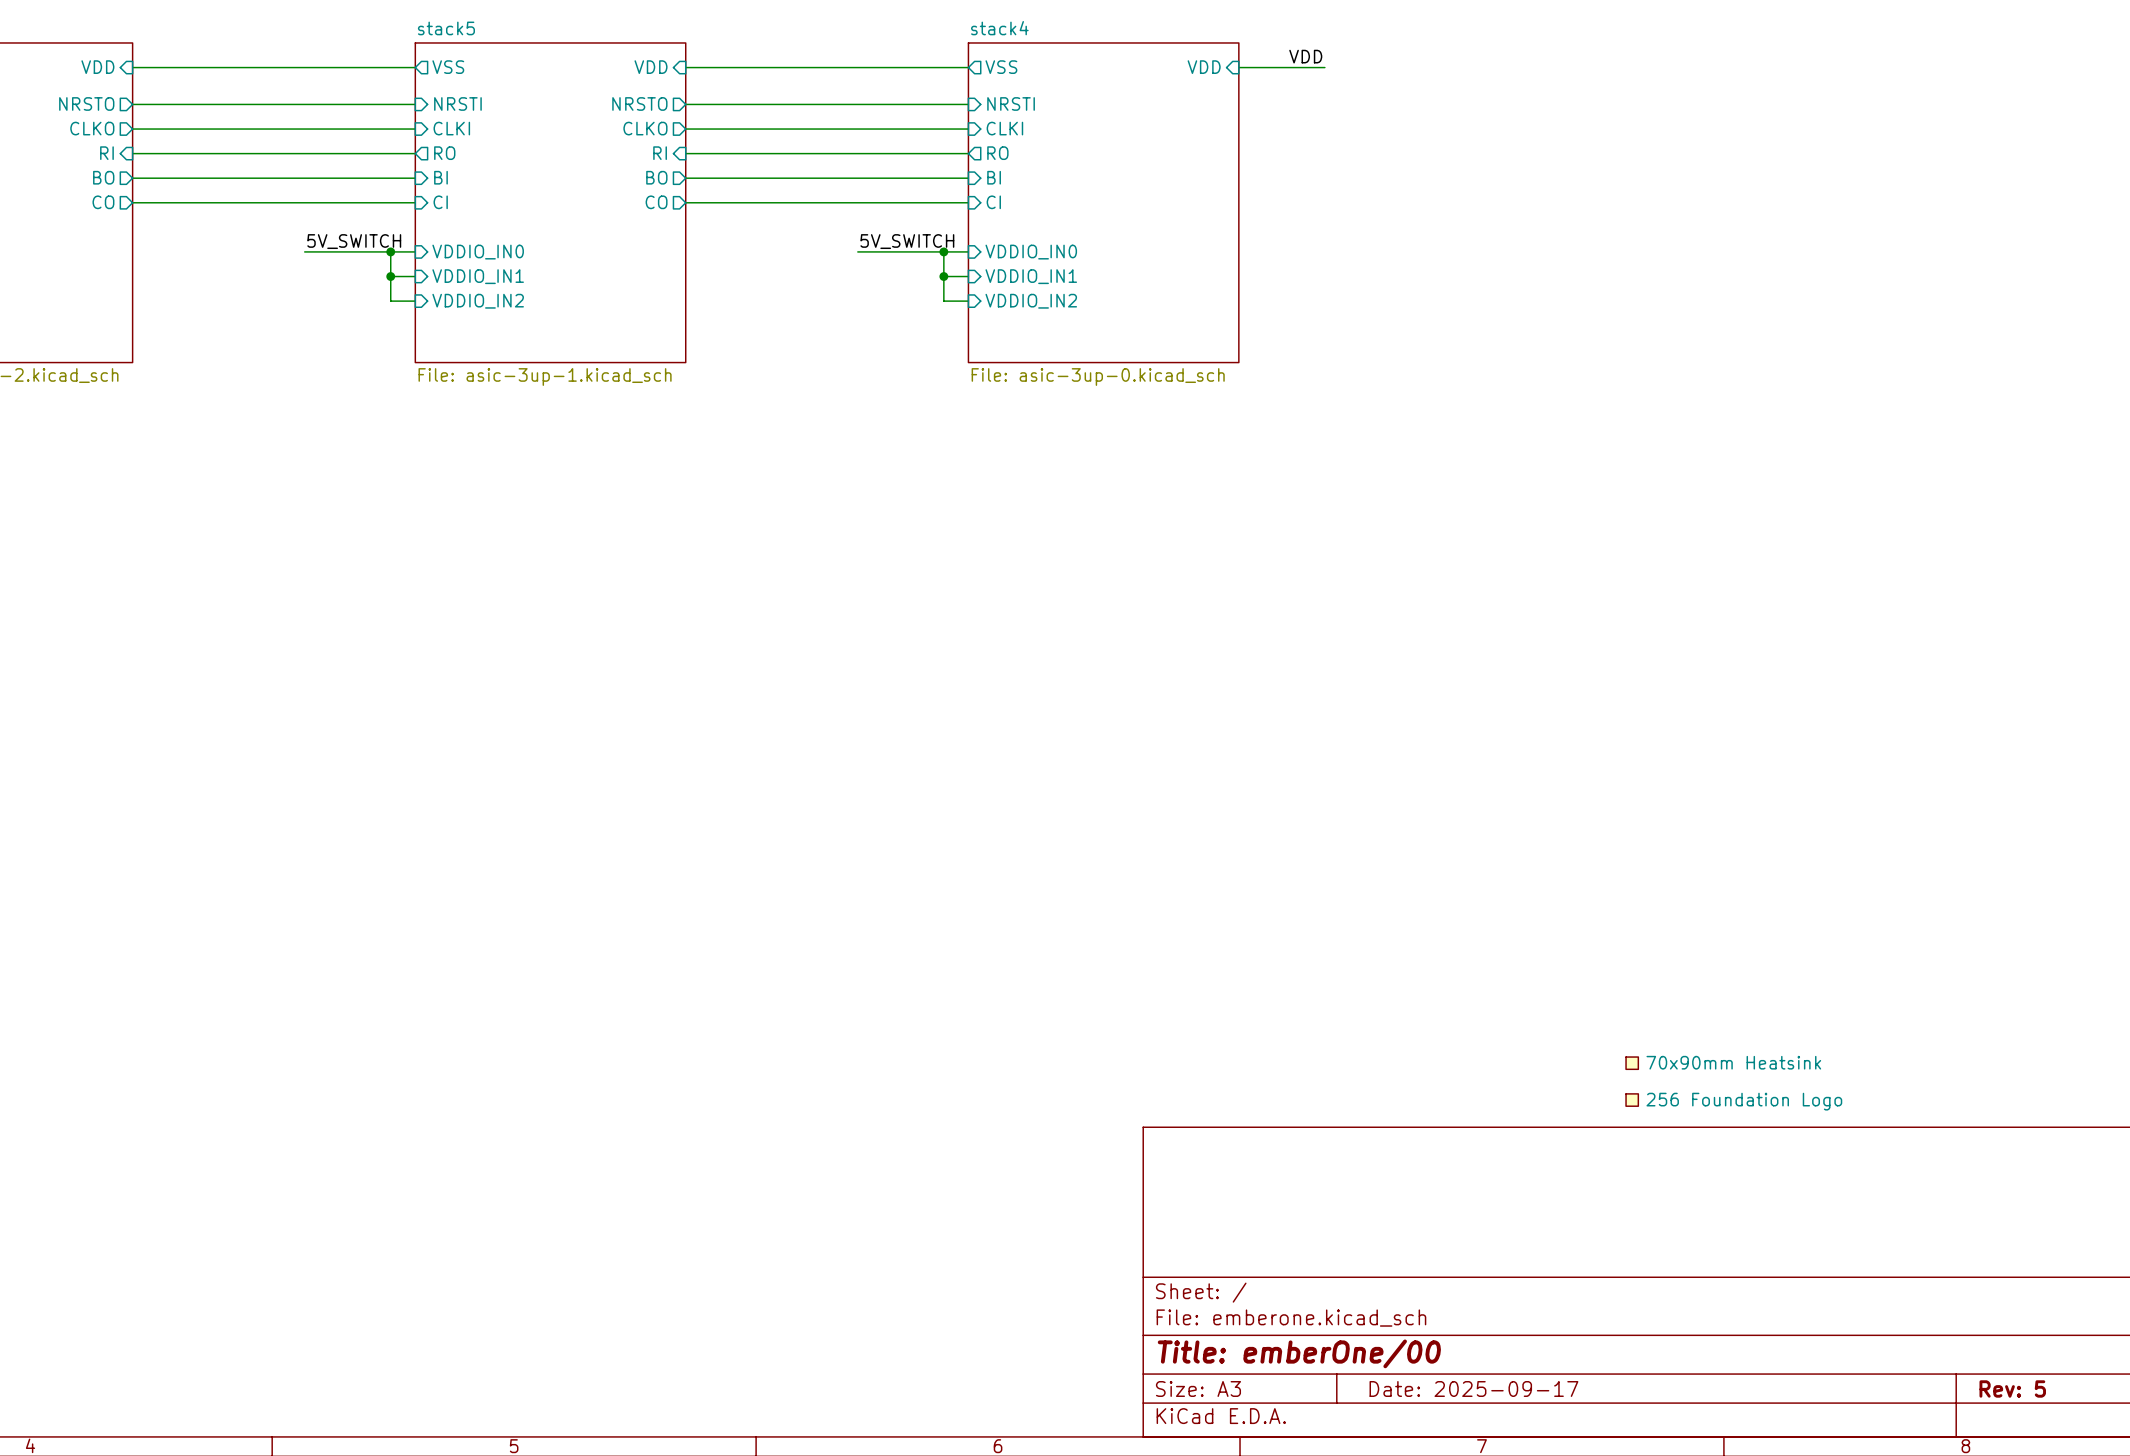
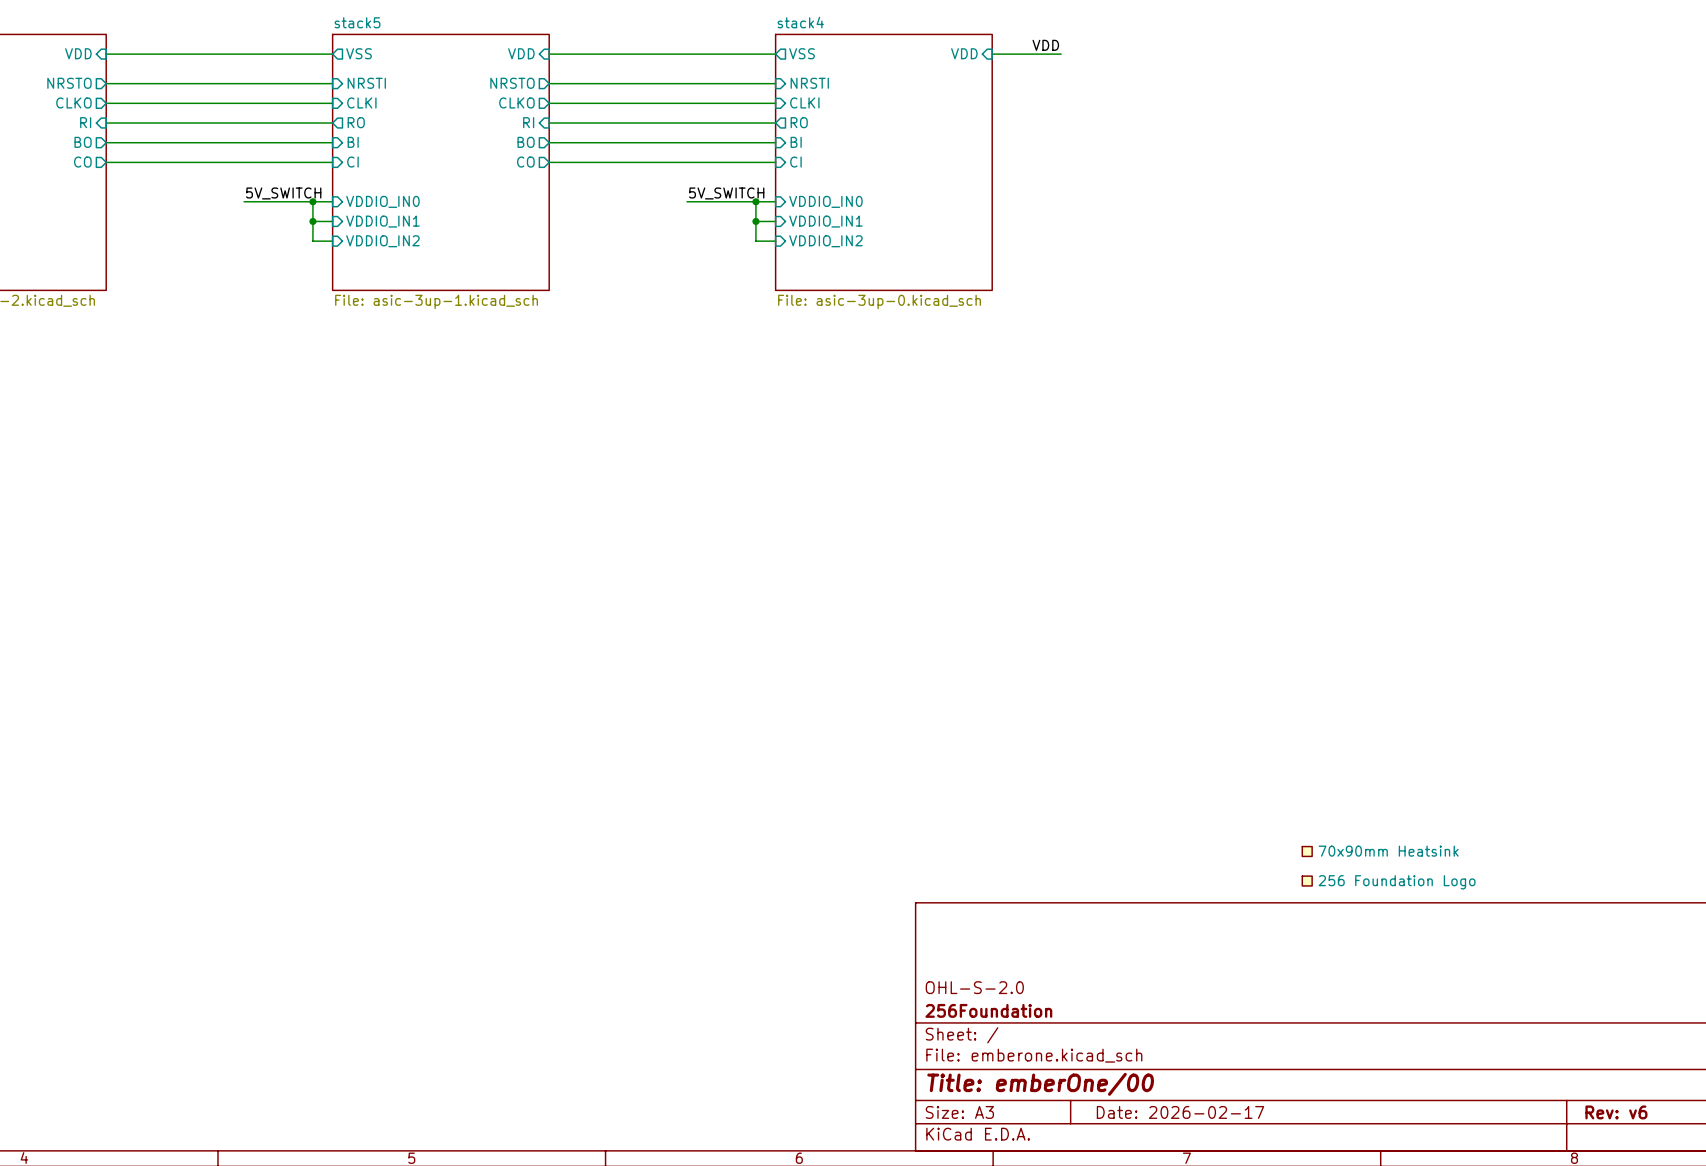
title block: none -> OHL-S-2.0 (974, 987)
title block: none -> 256Foundation (988, 1010)
title block: Date: 2025-09-17 (1473, 1388) -> Date: 2026-02-17 (1180, 1112)
title block: Rev: 5 (2012, 1388) -> Rev: v6 (1616, 1112)

